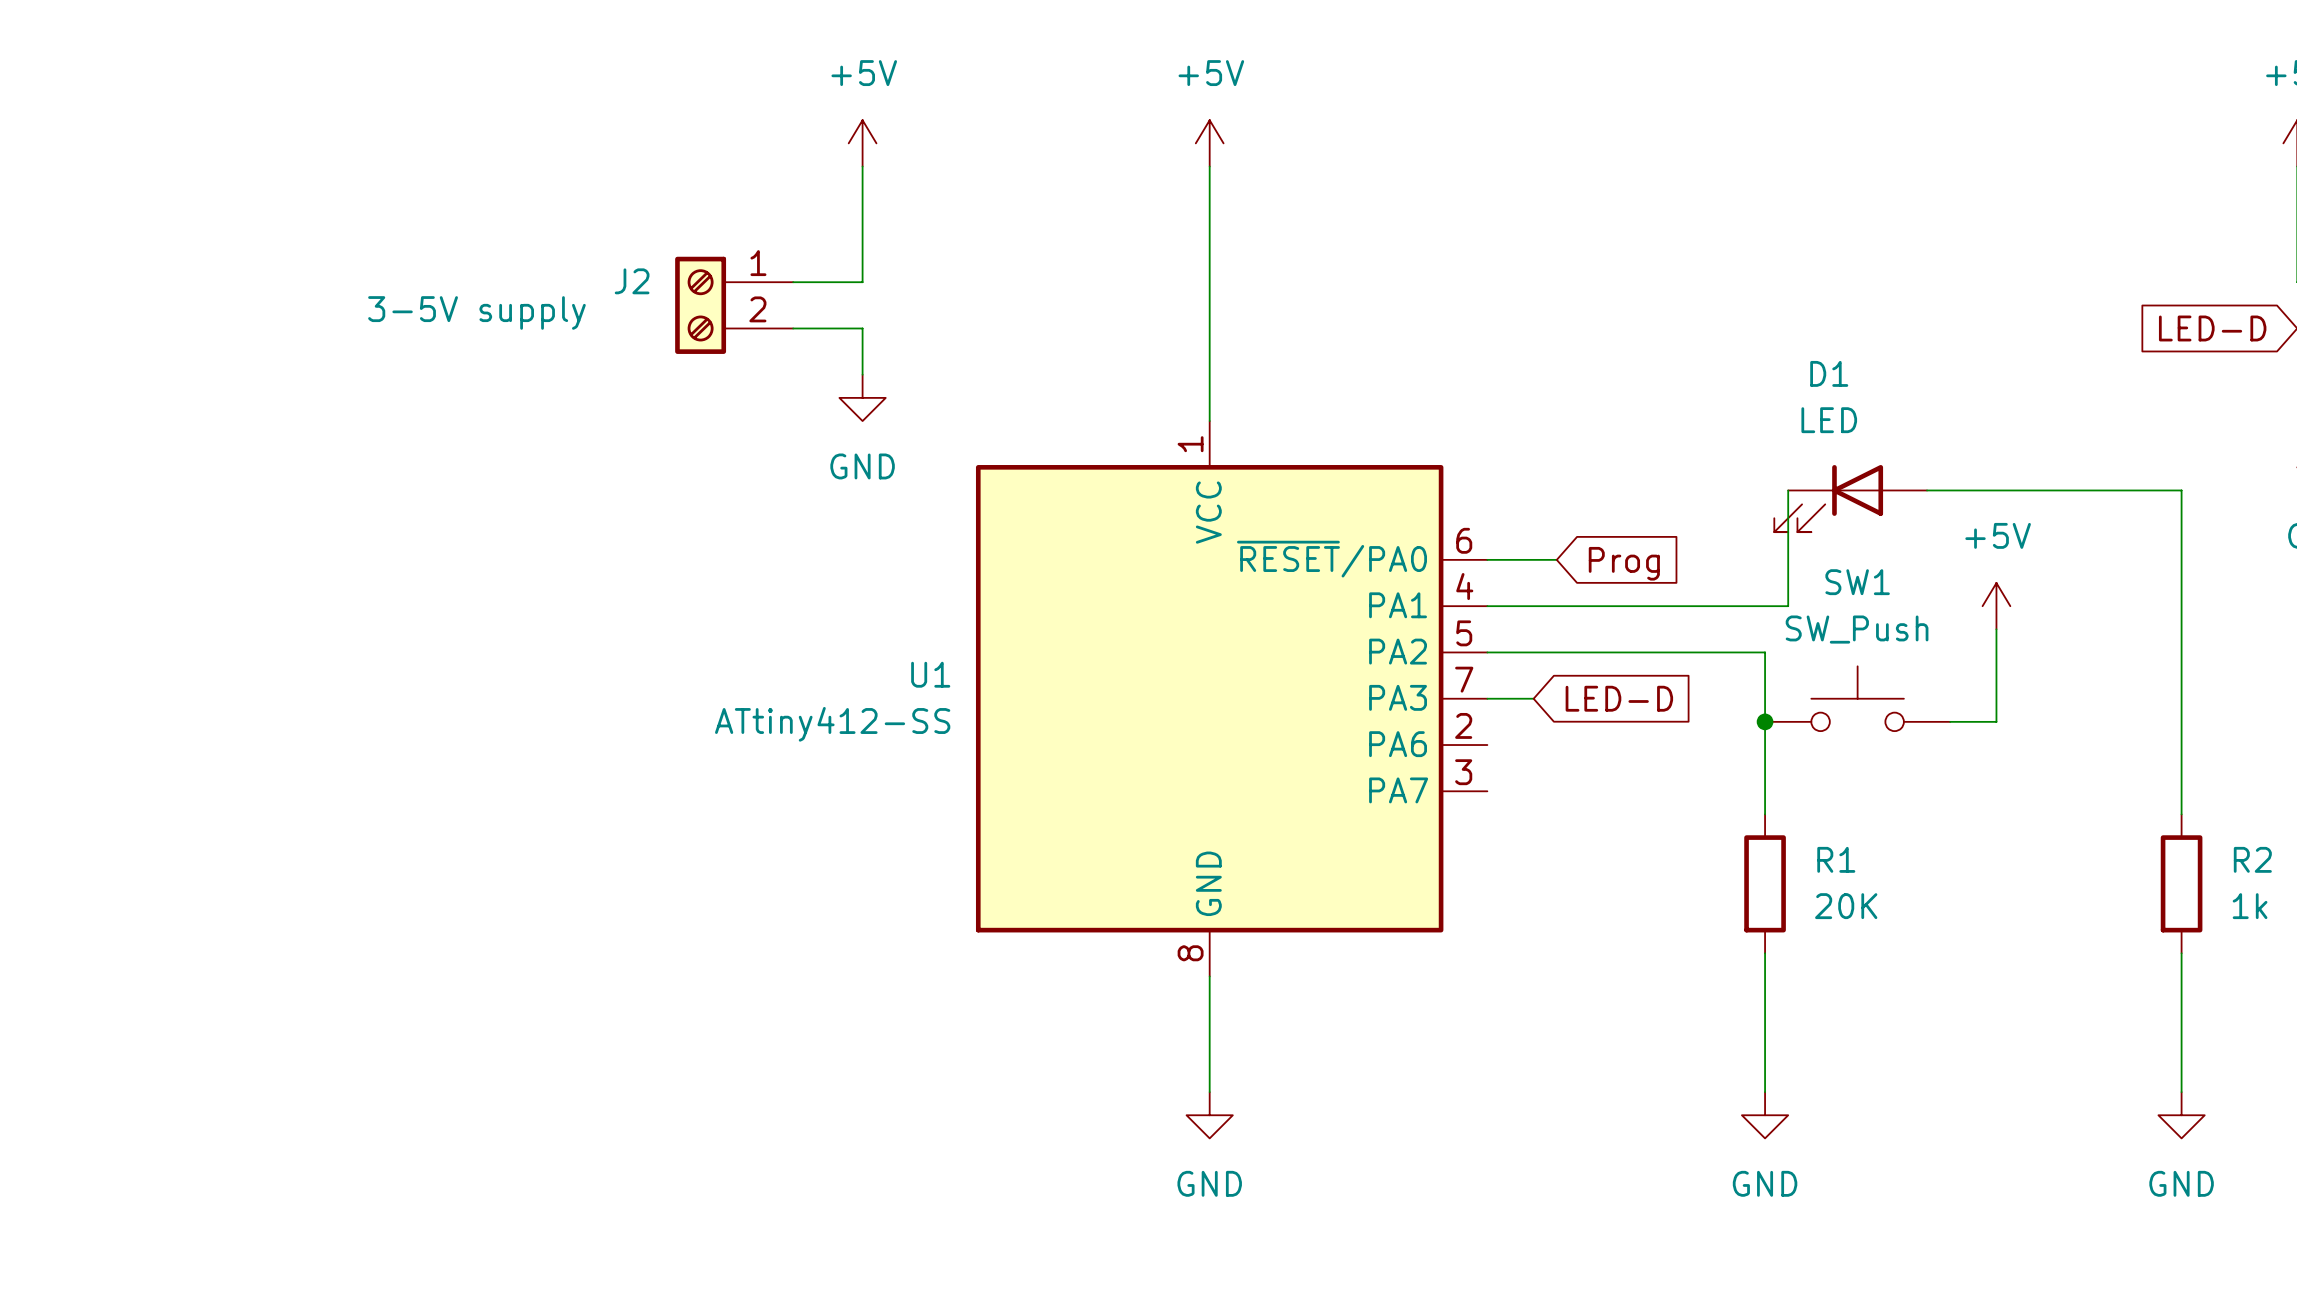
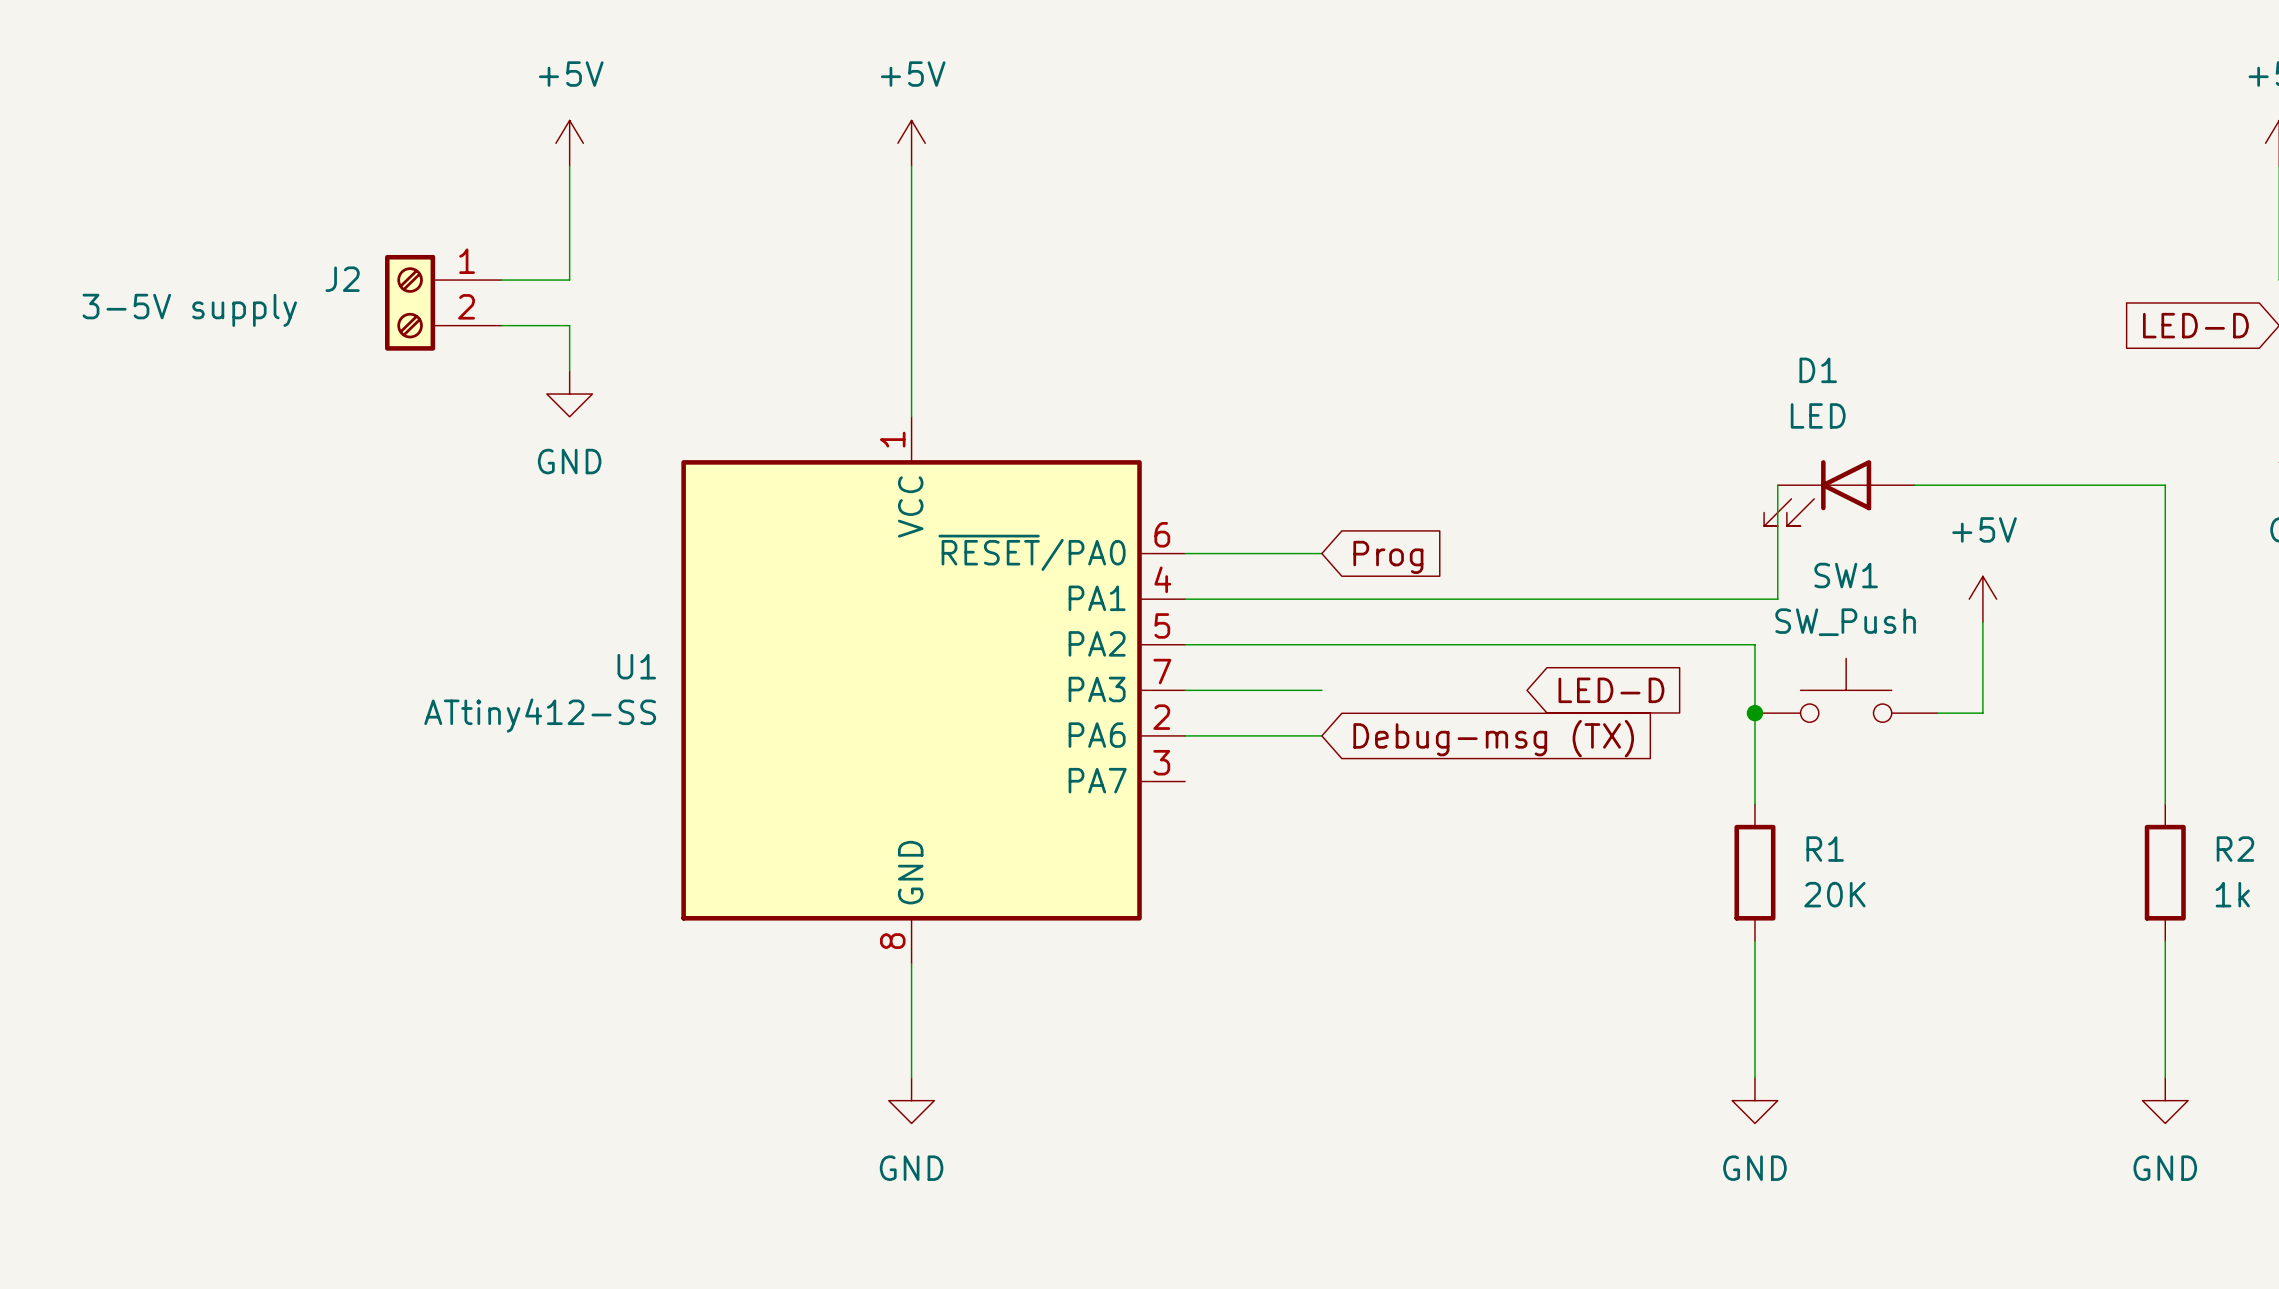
power symbol: none -> +5V (569, 143)
power symbol position: +5V (862, 143) -> +5V (911, 143)
power symbol: +5V (1209, 143) -> none
wire: (862, 166) (862, 282) (793, 282) -> (569, 166) (569, 280) (501, 280)
wire: (1209, 166) (1209, 421) -> (911, 166) (911, 416)
J2 position: (734, 305) -> (443, 302)
wire: (793, 328) (862, 328) (862, 374) -> (501, 325) (569, 325) (569, 371)
power symbol position: GND (862, 397) -> GND (569, 394)
wire: (1487, 559) (1556, 559) -> none
global label position: Prog (1624, 563) -> Prog (1388, 557)
U1 position: (1231, 698) -> (933, 690)
wire: (1487, 698) (1533, 698) -> none
global label: none -> Debug-msg (TX) (1493, 738)
wire: (1209, 976) (1209, 1092) -> (911, 963) (911, 1077)
power symbol position: GND (1209, 1115) -> GND (911, 1100)

